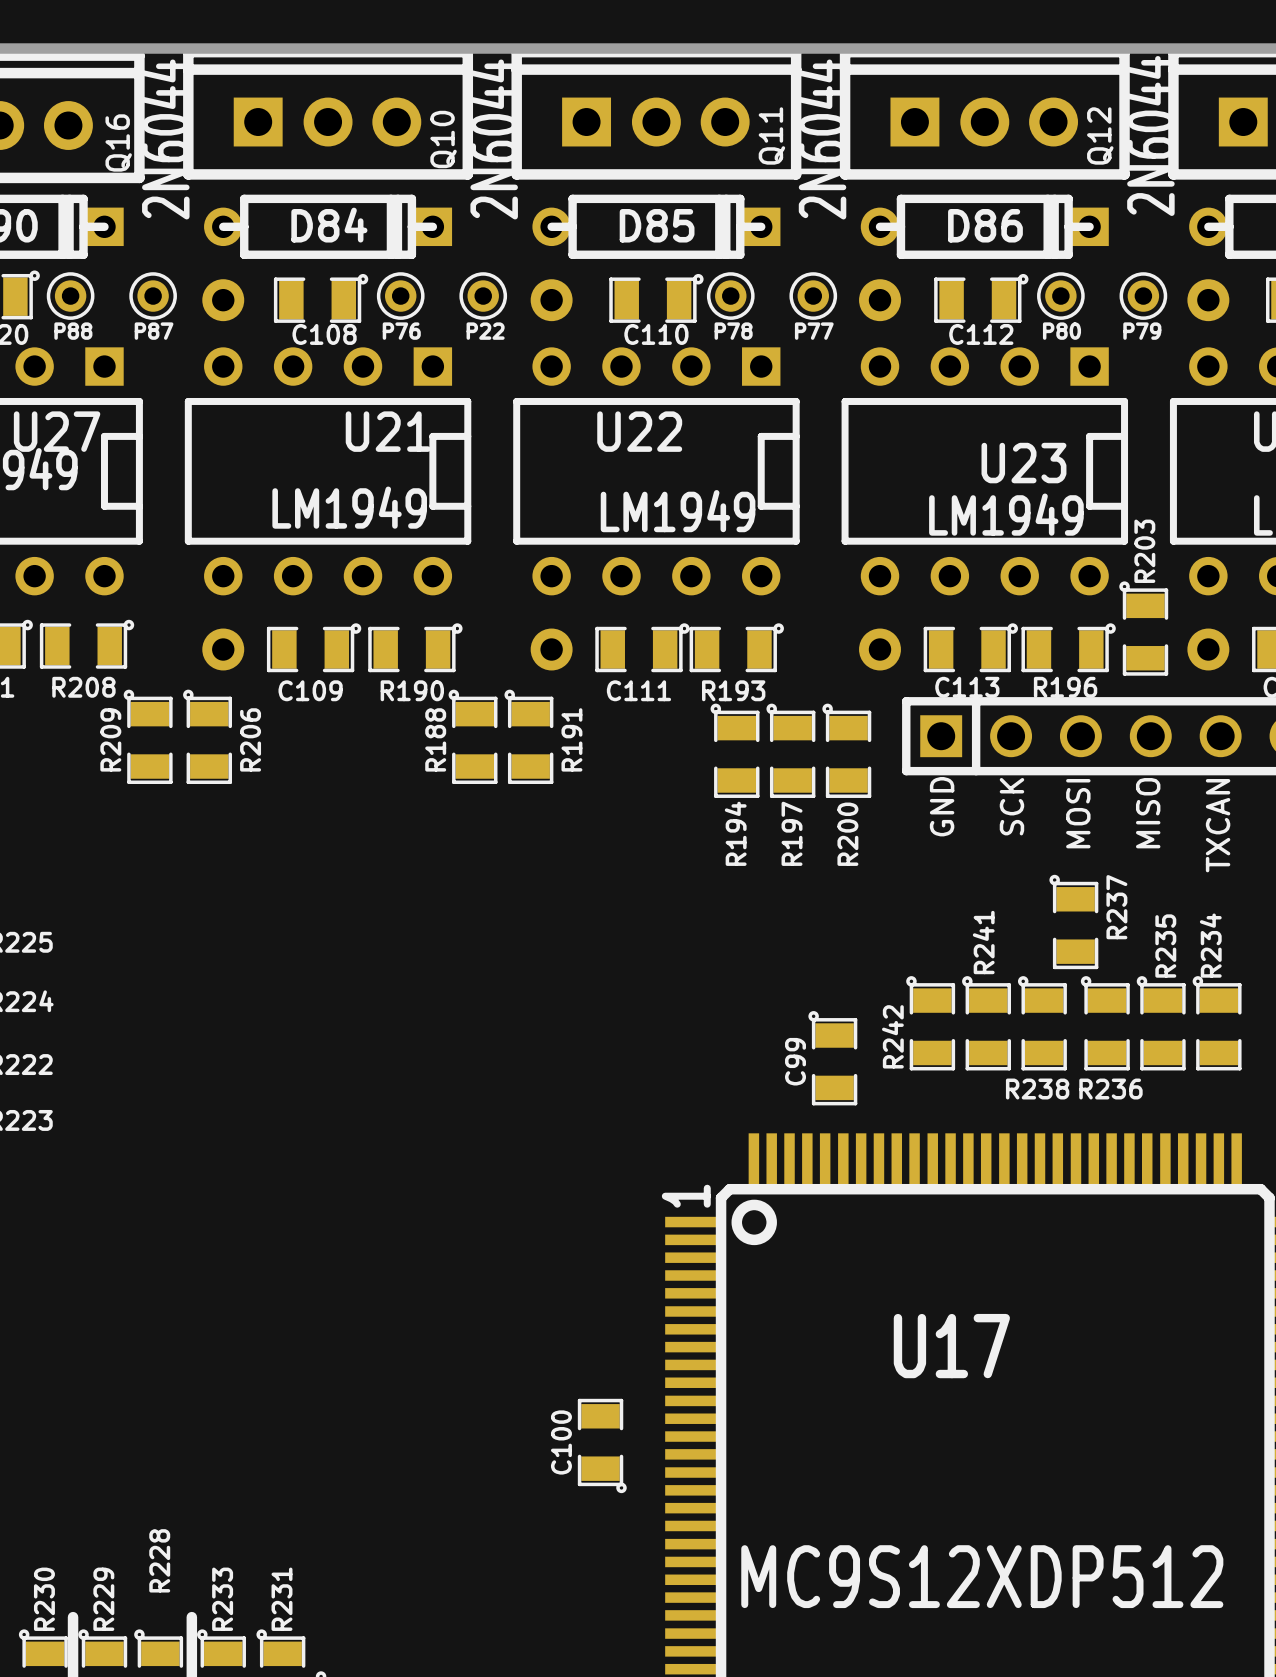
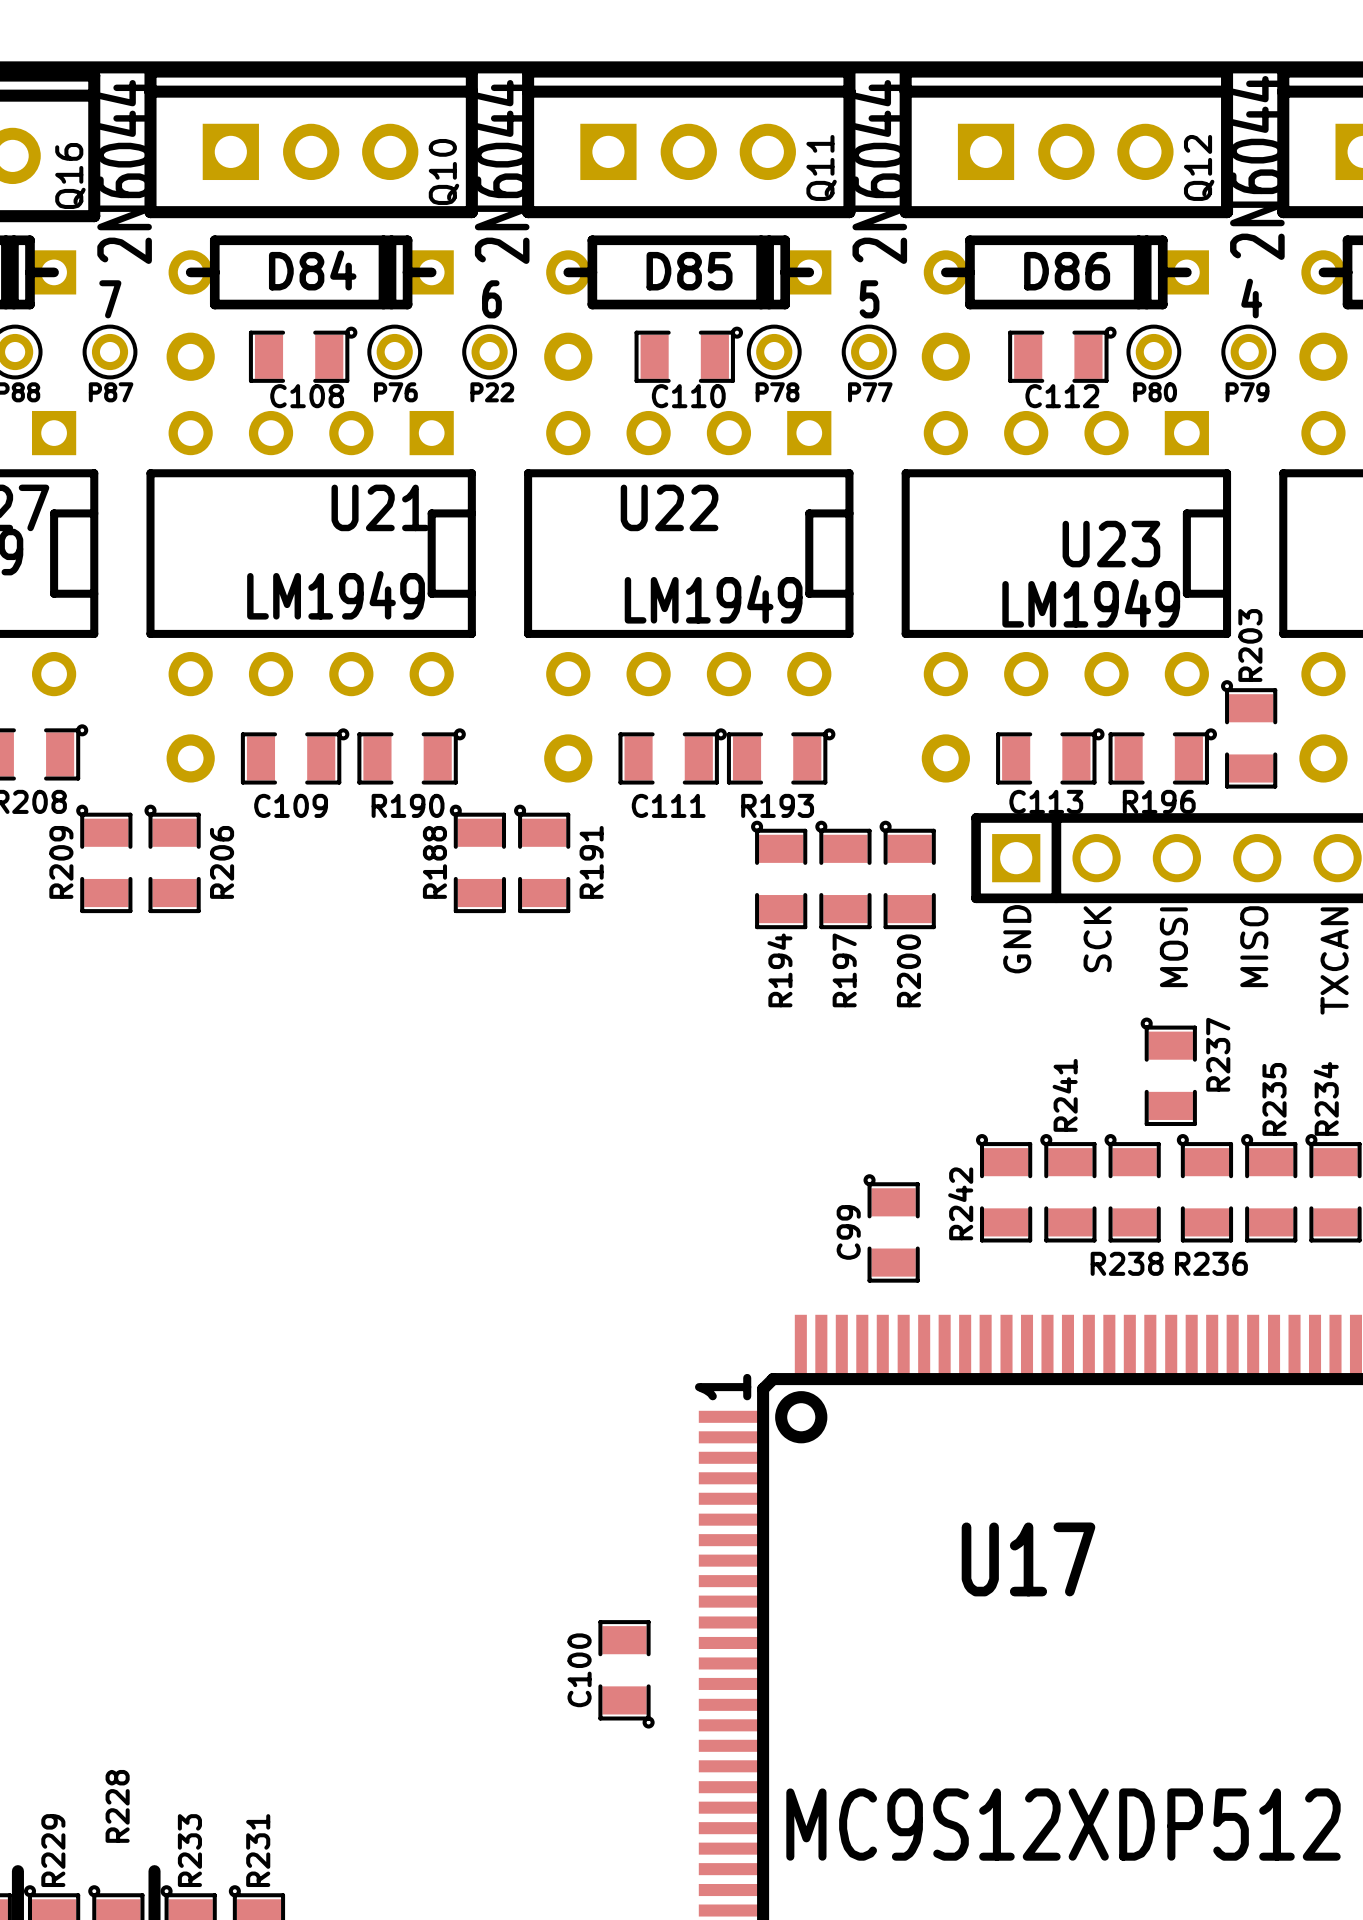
text: none -> 4 (1251, 298)
text: none -> 7 (110, 299)
text: none -> 6 (491, 299)
text: none -> 5 (869, 299)

